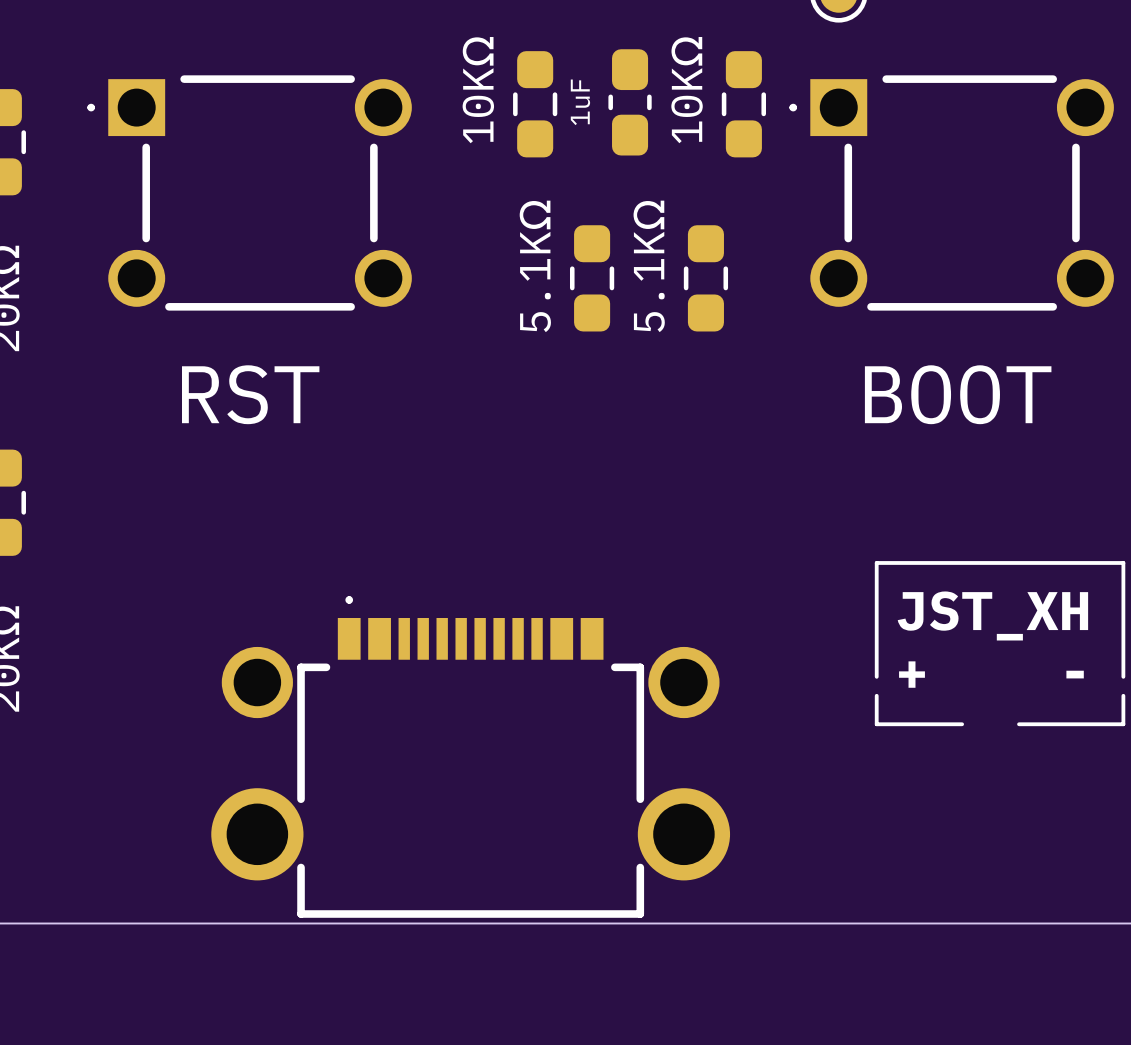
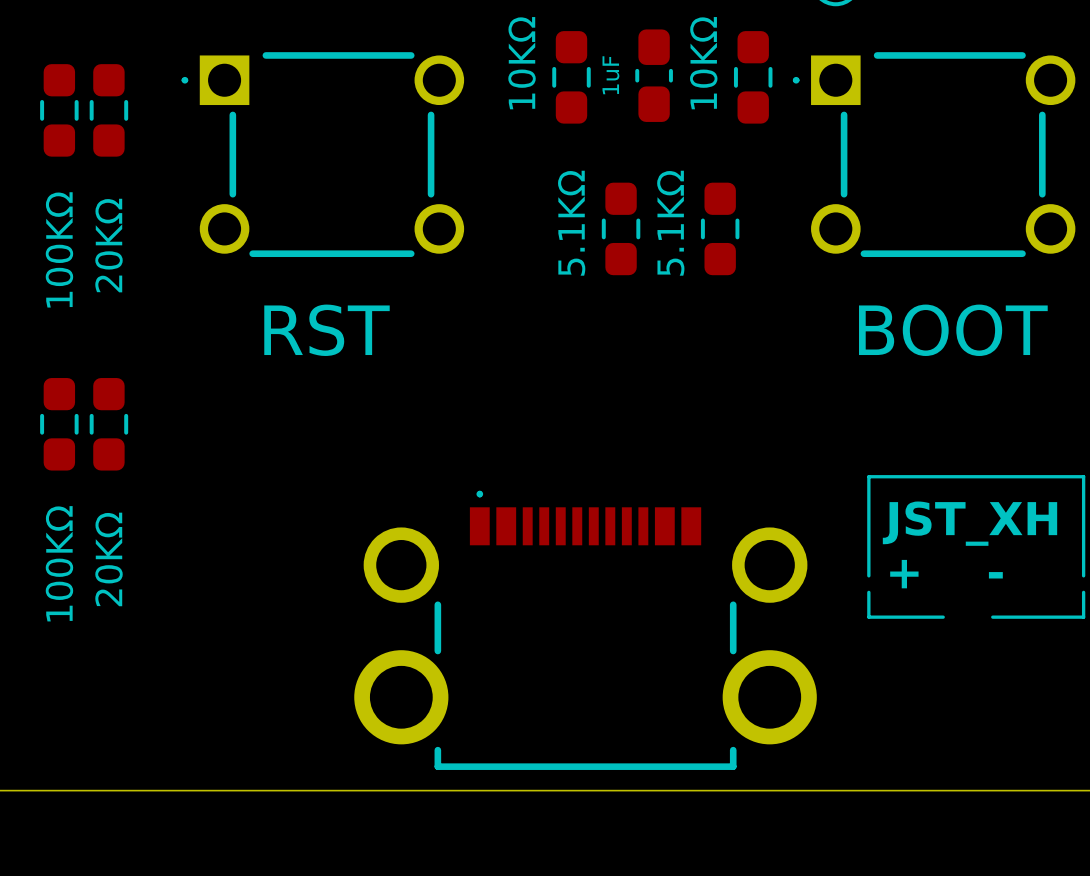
part: none -> (585, 630)
part: (470, 756) -> none

